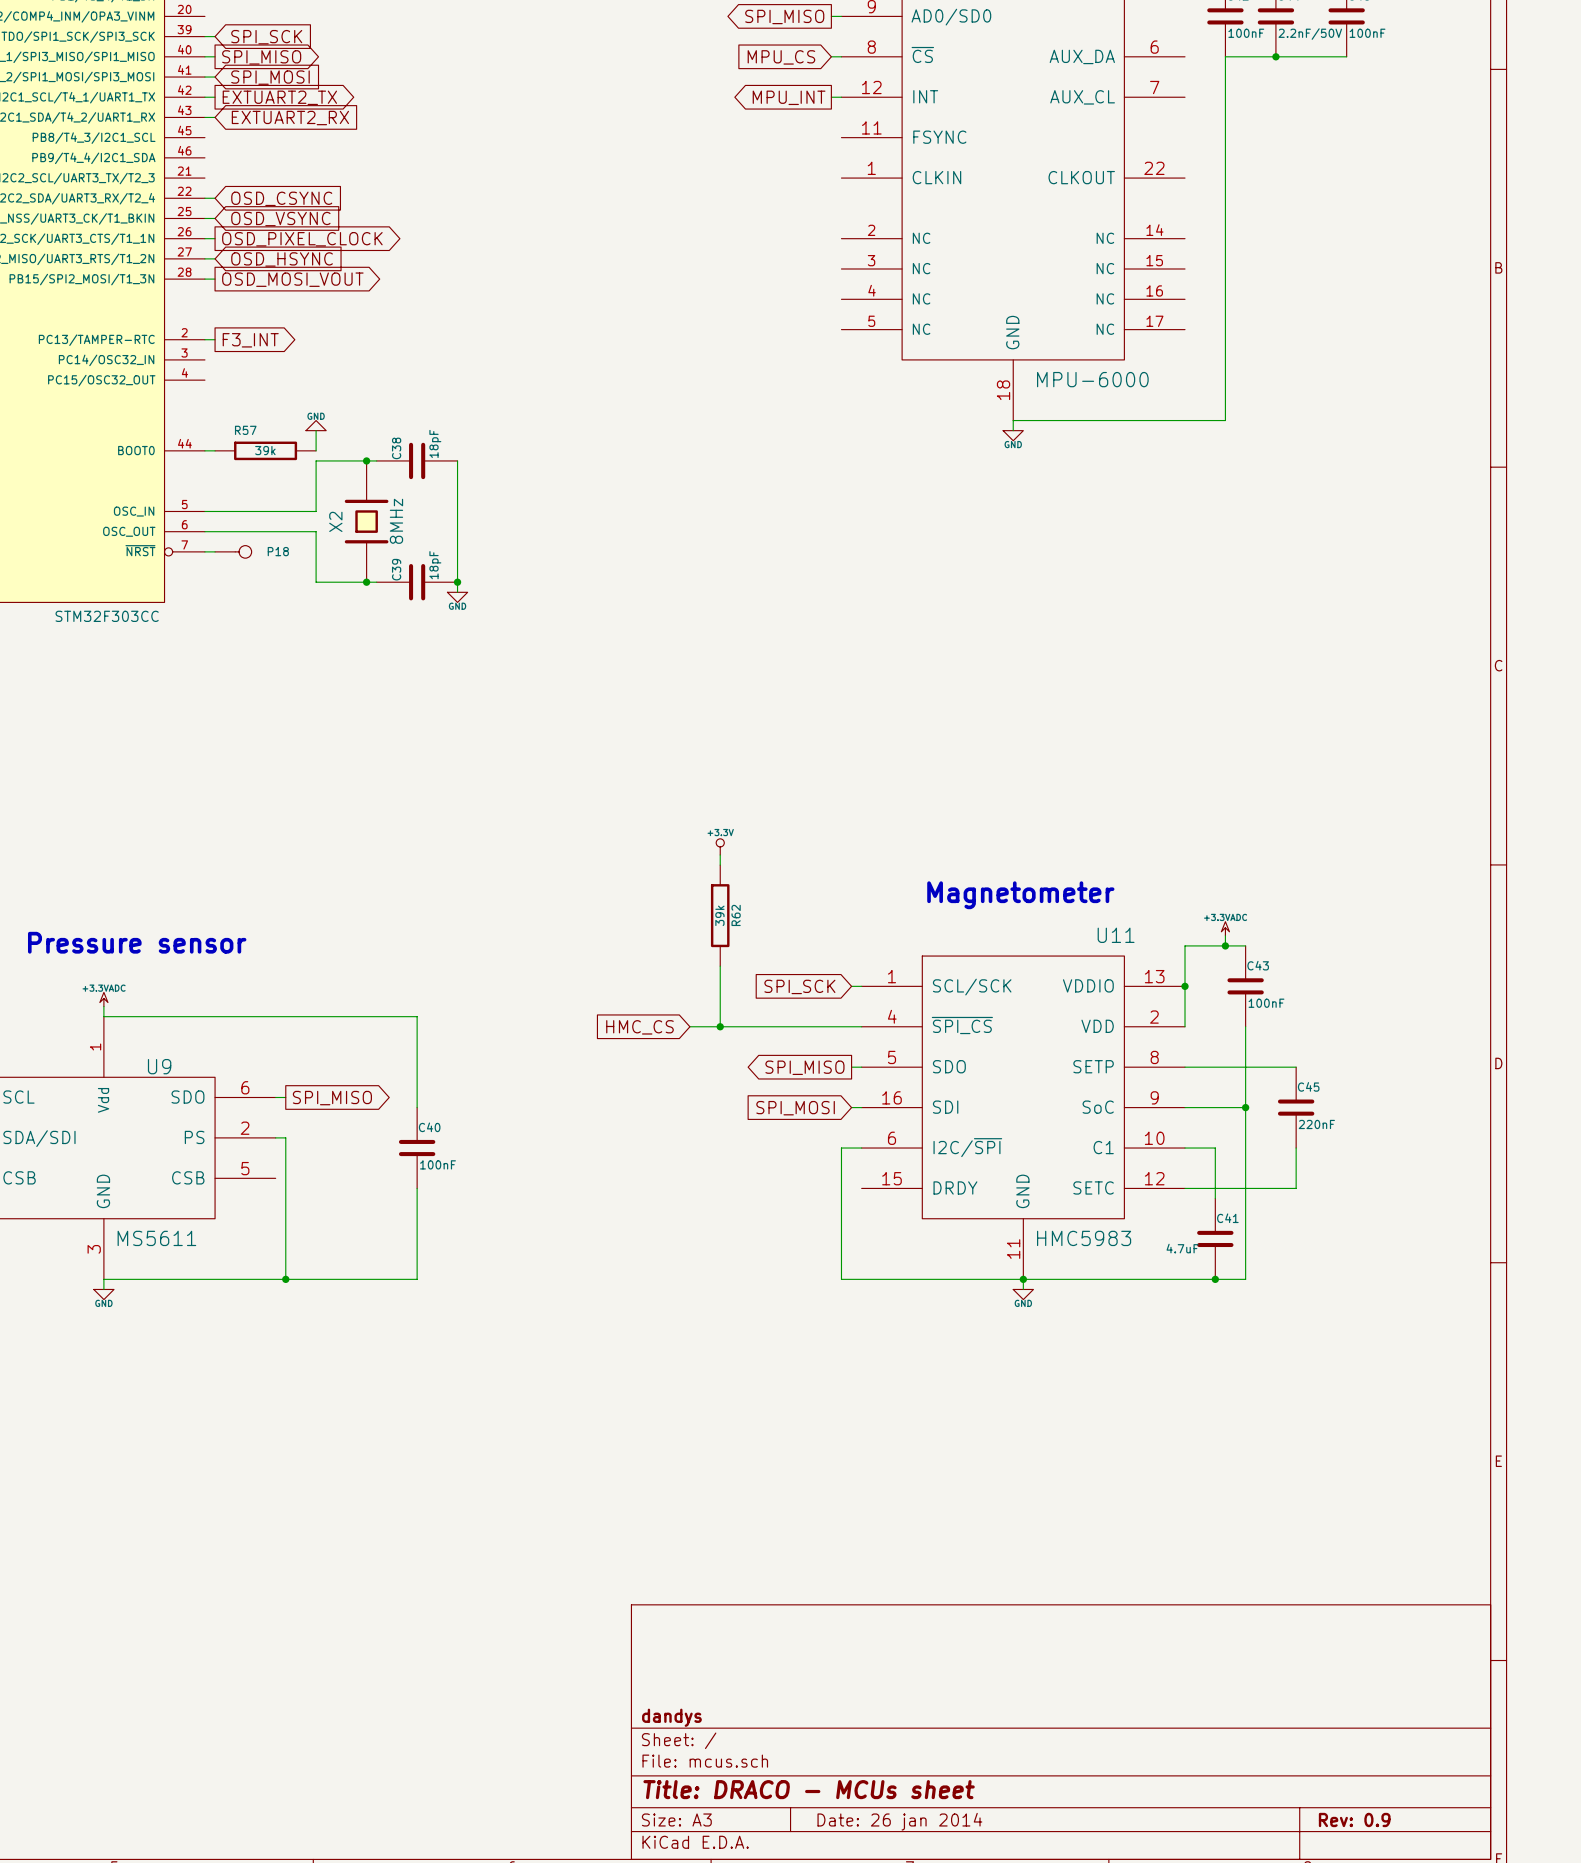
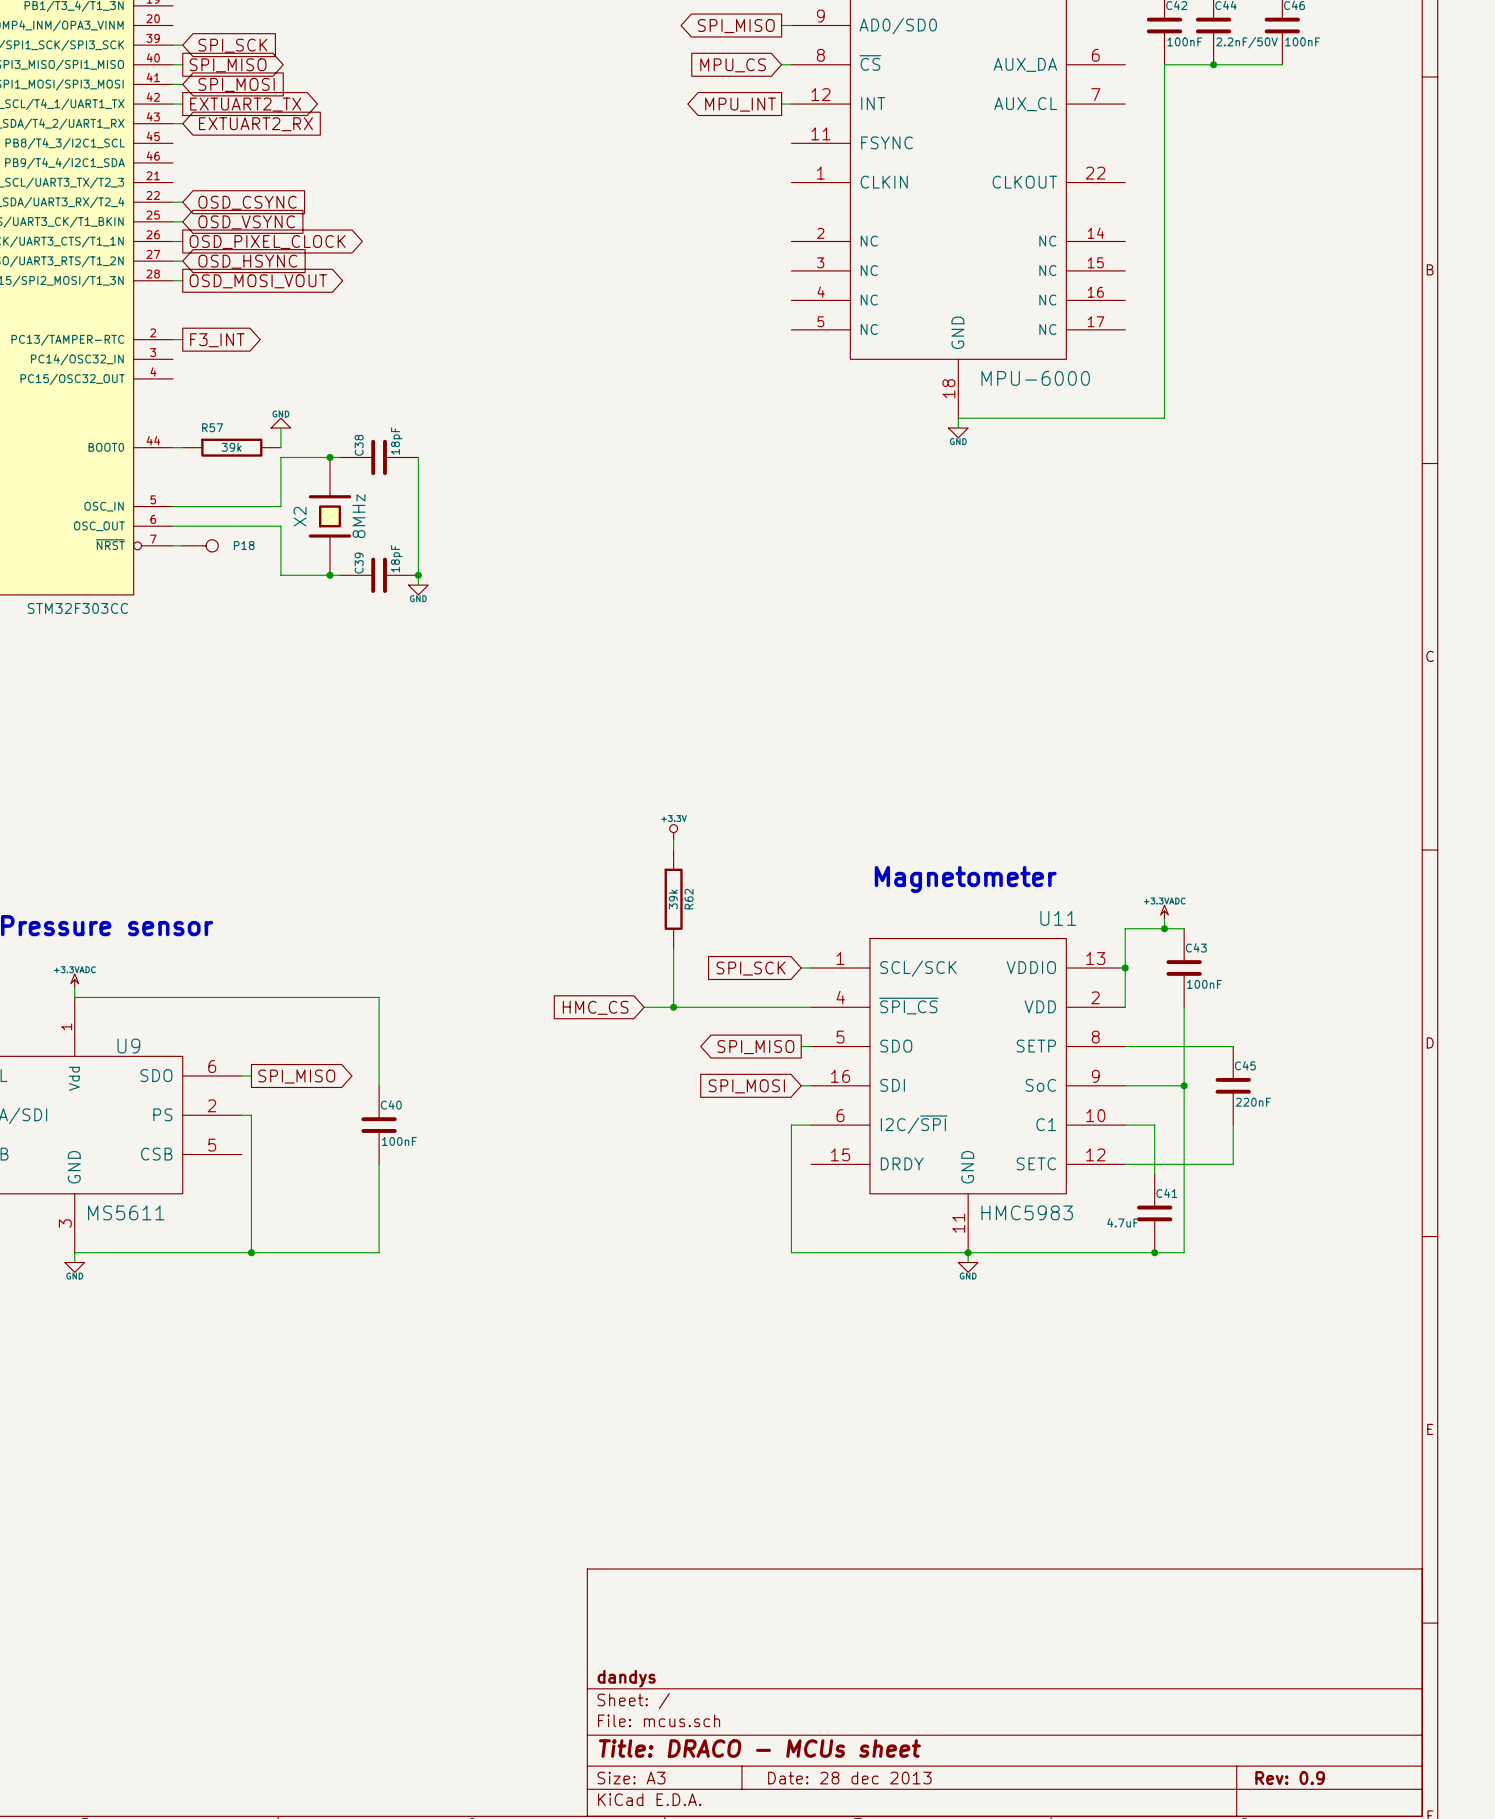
title block: Date: 26 jan 2014 (899, 1821) -> Date: 28 dec 2013 (849, 1778)

